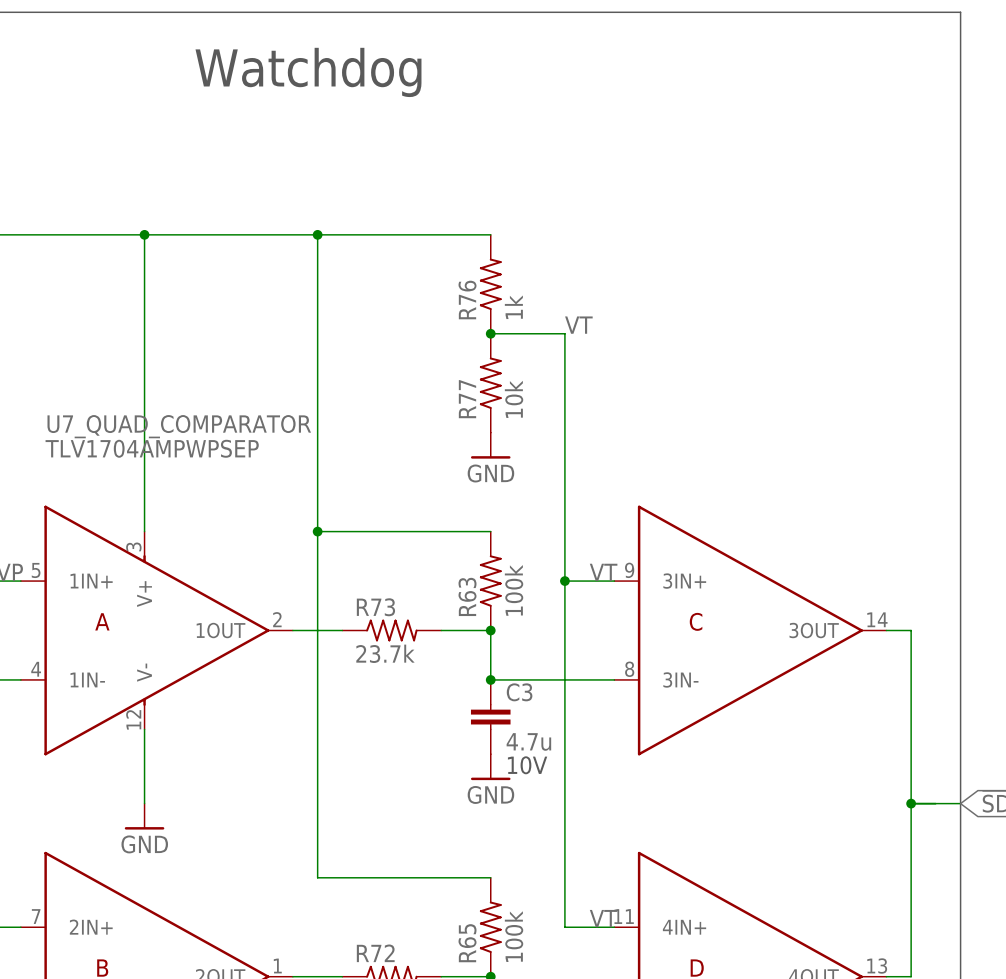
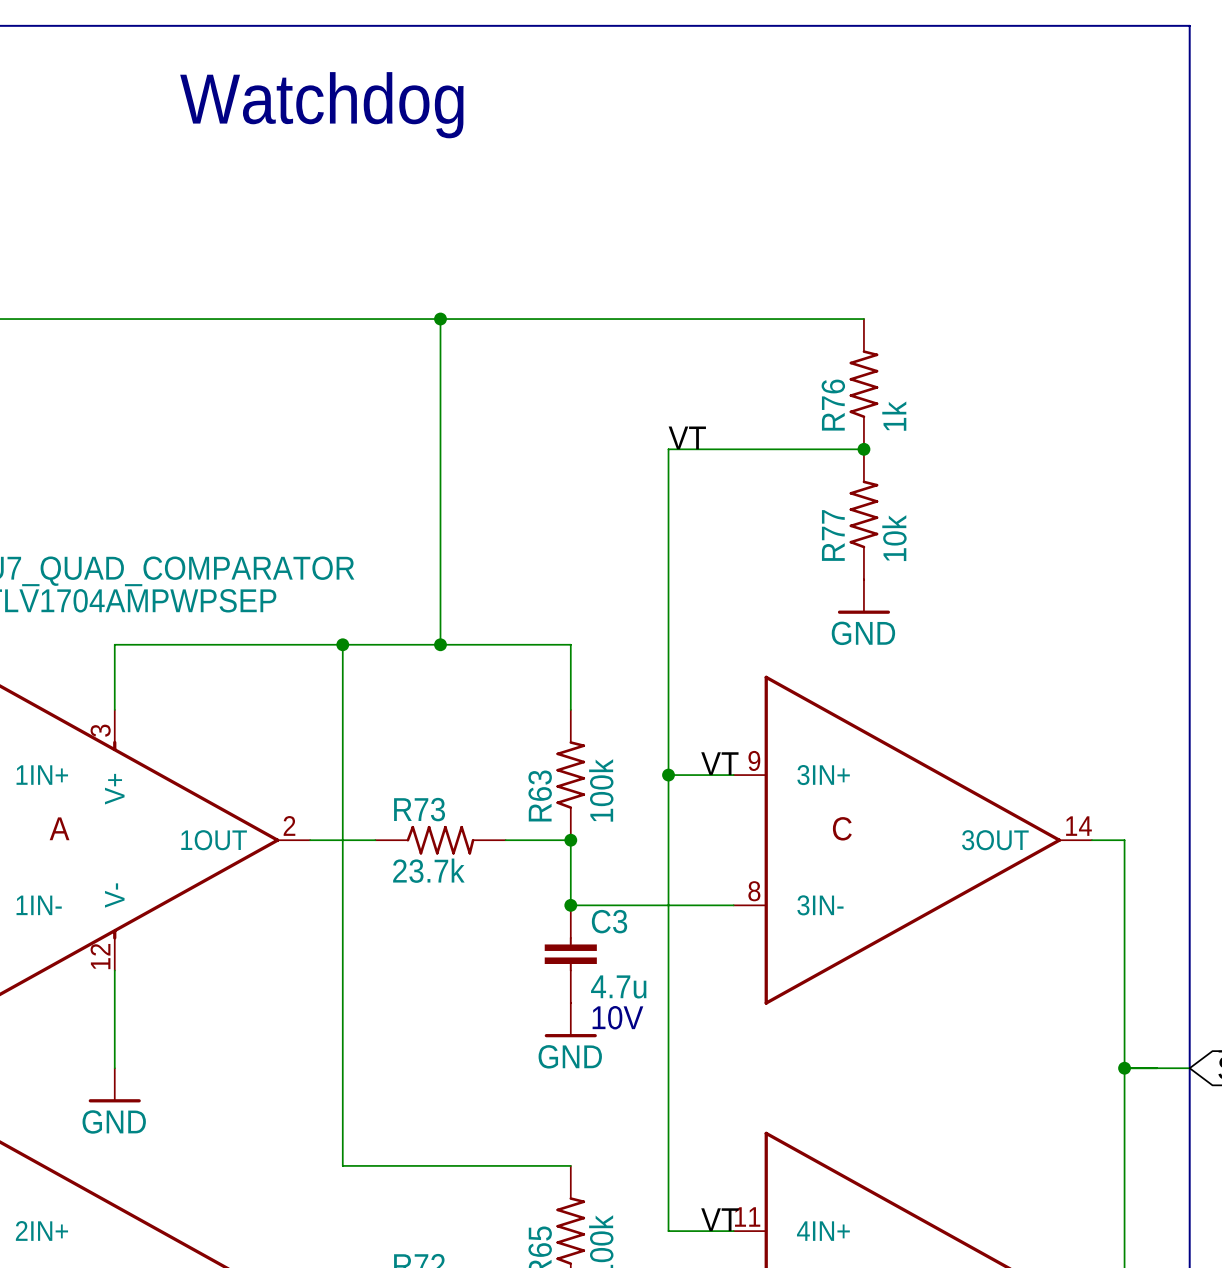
wire: (144, 234) (144, 482) -> none
junction: (144, 234) -> none
wire: (317, 234) (317, 482) -> (440, 319) (440, 644)
junction: (317, 234) -> none
junction: none -> (440, 319)
wire: none -> (570, 319) (863, 319)
R76 position: (490, 284) -> (863, 384)
wire: (490, 333) (564, 333) -> (863, 449) (668, 449)
junction: (490, 333) -> none
junction: none -> (863, 449)
R77 position: (490, 383) -> (863, 514)
power symbol position: GND (490, 445) -> GND (863, 596)
junction: none -> (342, 644)
junction: none -> (440, 644)
wire: (317, 531) (490, 531) -> (114, 644) (570, 644) (570, 709)
junction: (317, 531) -> none

